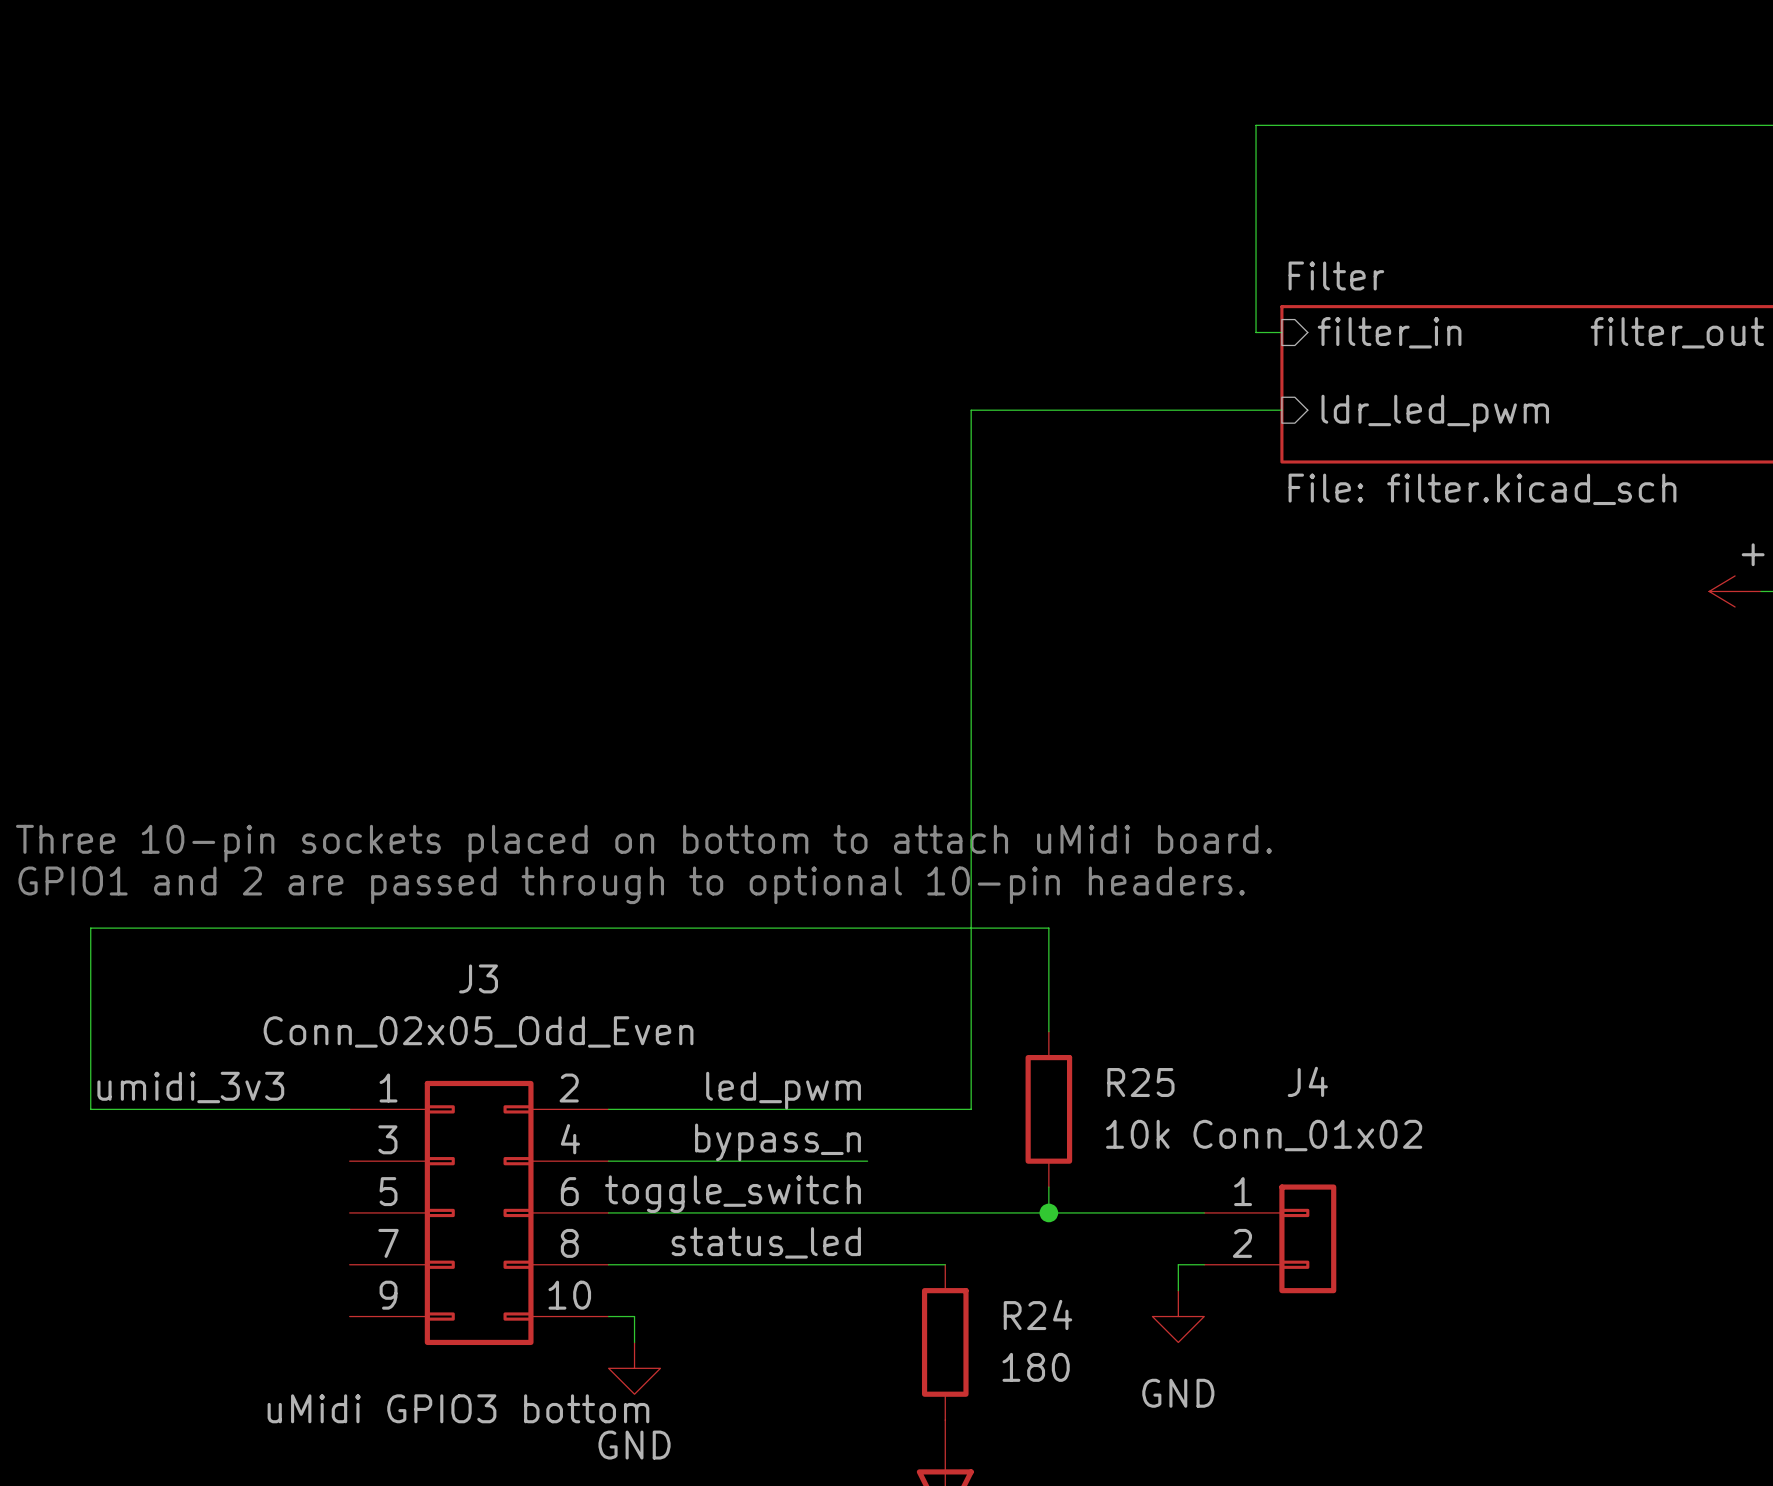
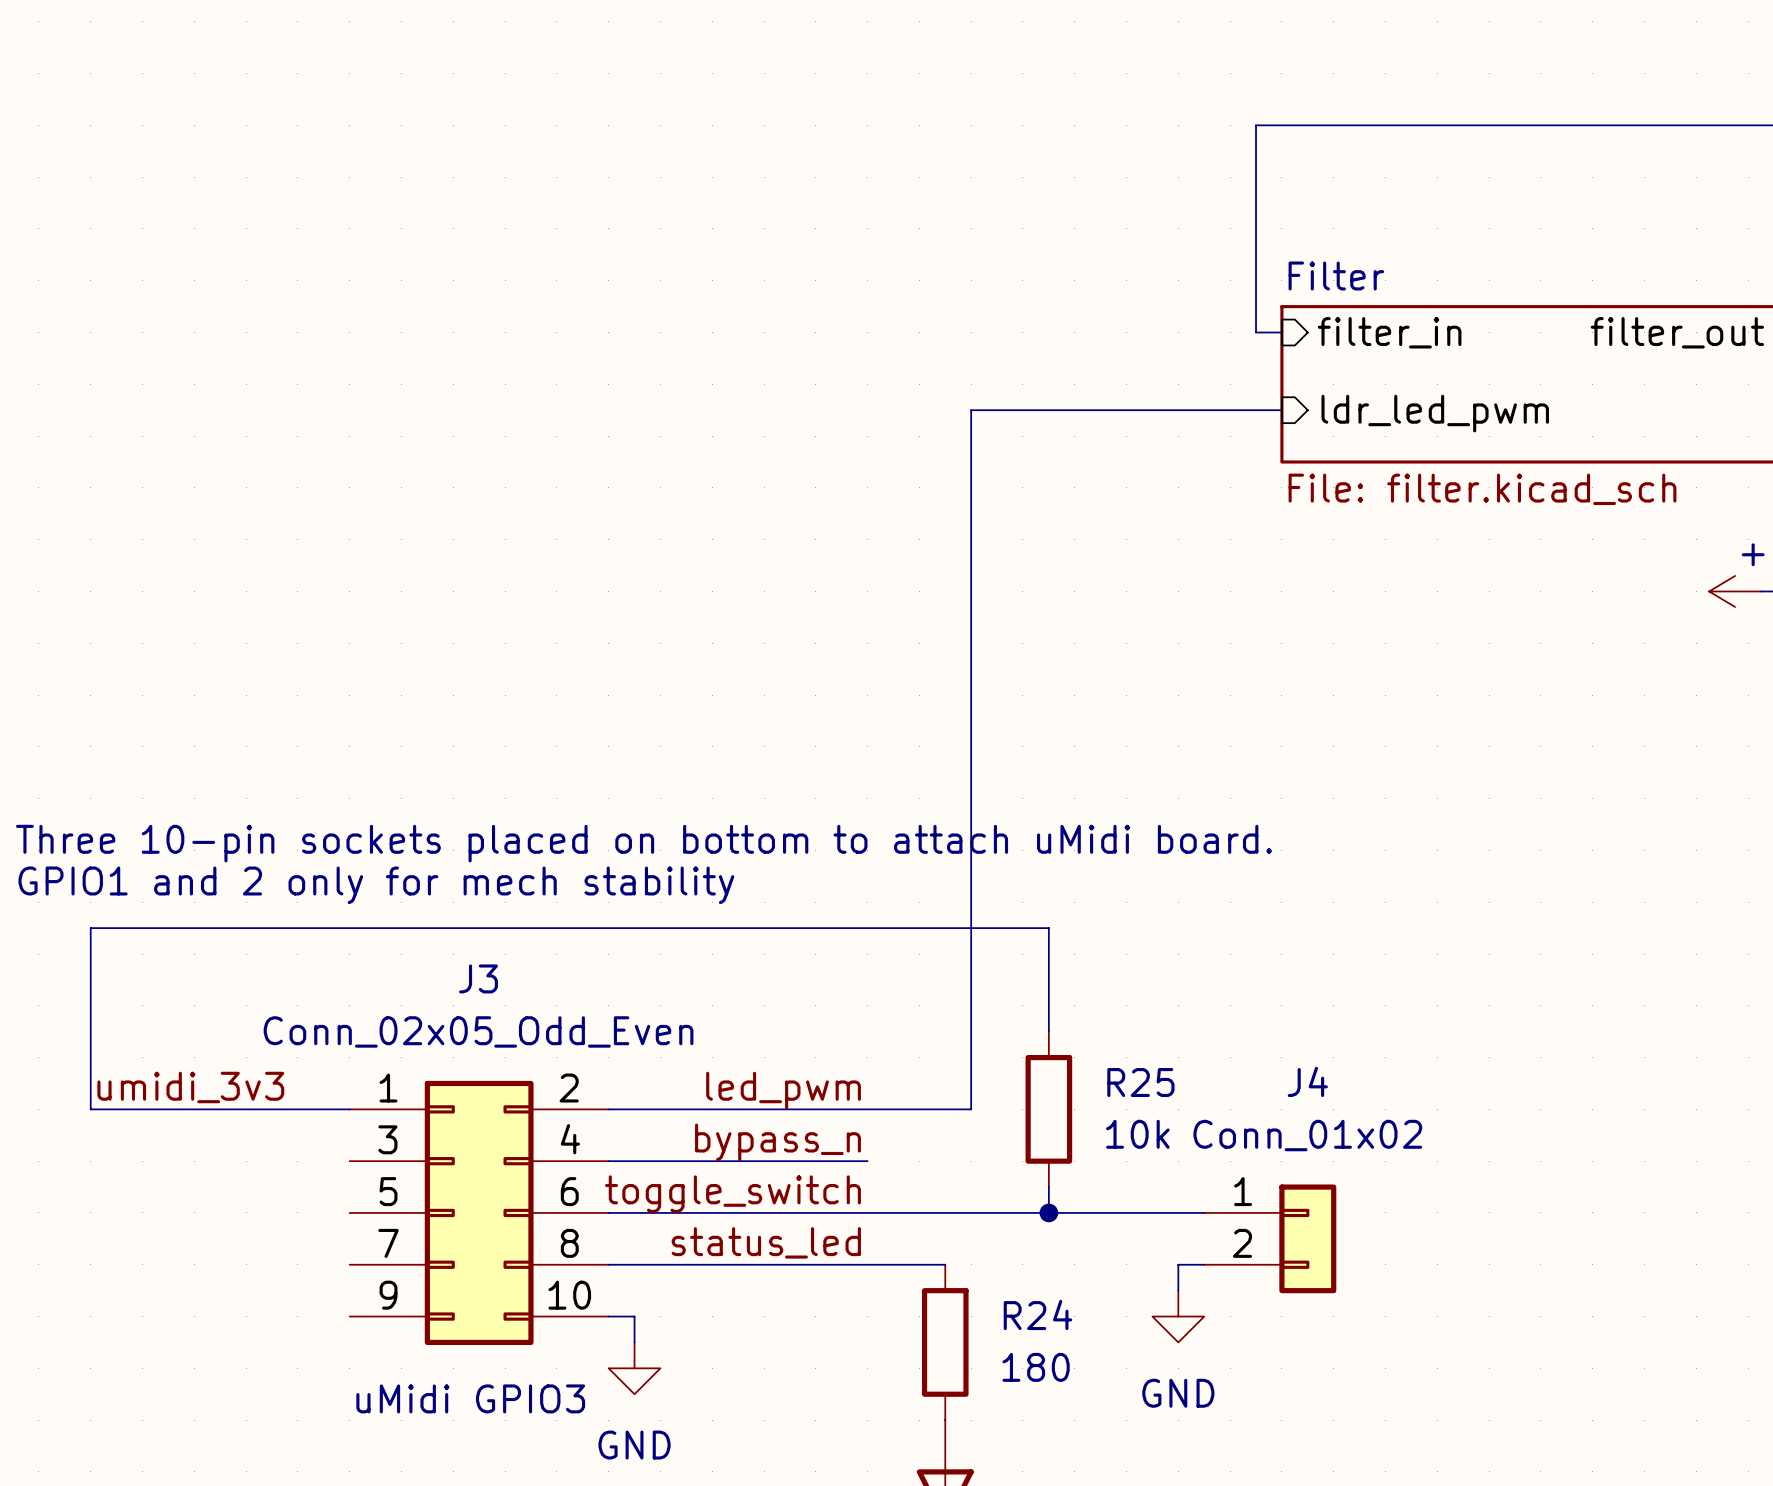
text: GPIO1 and 2 are passed through to optional 10-pin headers. (631, 885) -> GPIO1 and 2 only for mech stability (376, 885)
text: none -> uMidi GPIO3 (470, 1398)
J3 text: uMidi GPIO3 bottom (458, 1408) -> none

